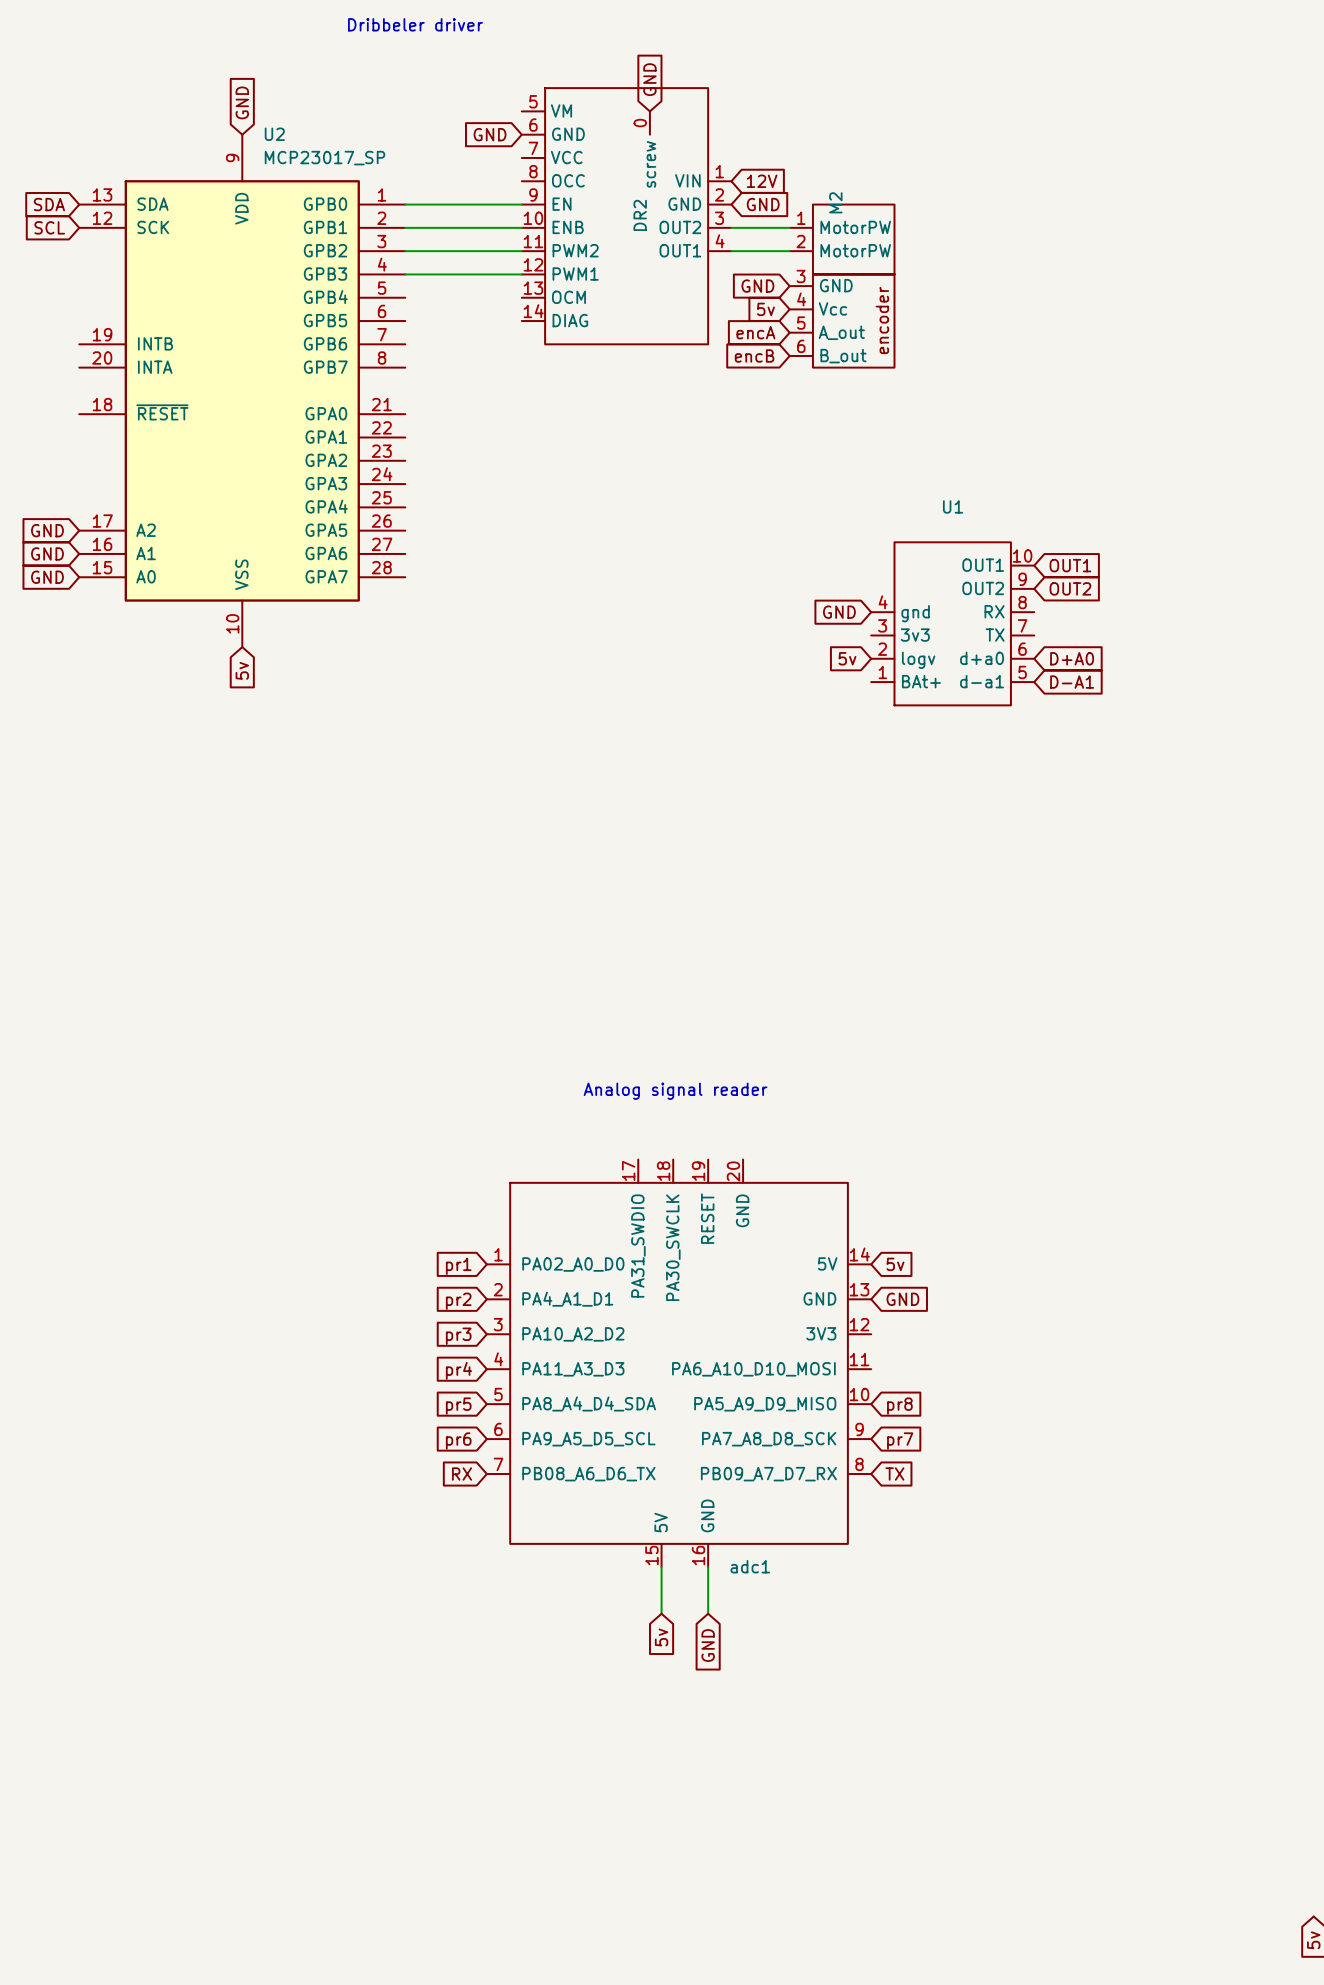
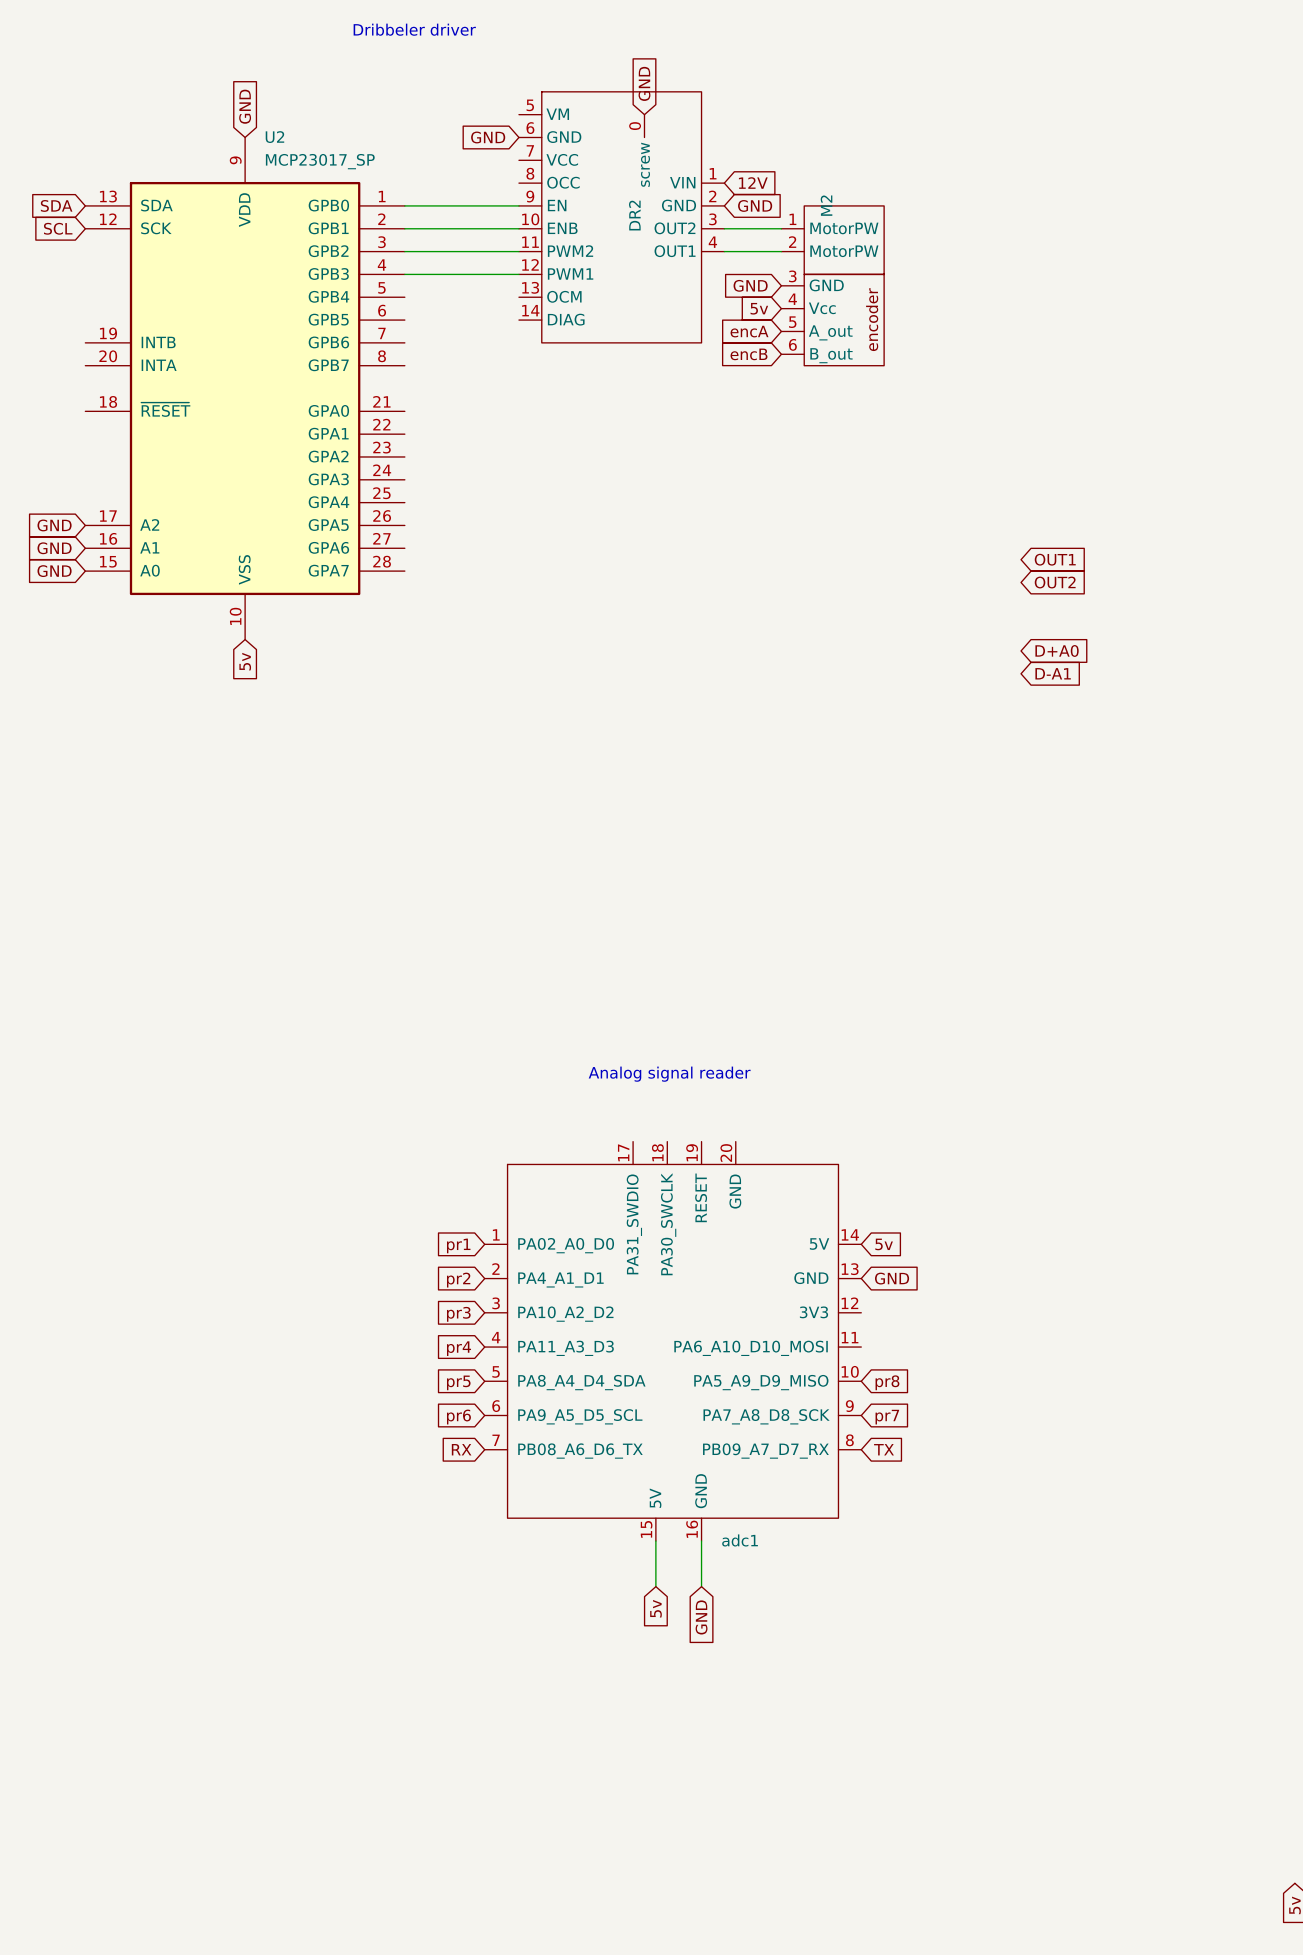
global label: GND (839, 612) -> none
U1: (952, 623) -> none
global label: 5v (847, 658) -> none

